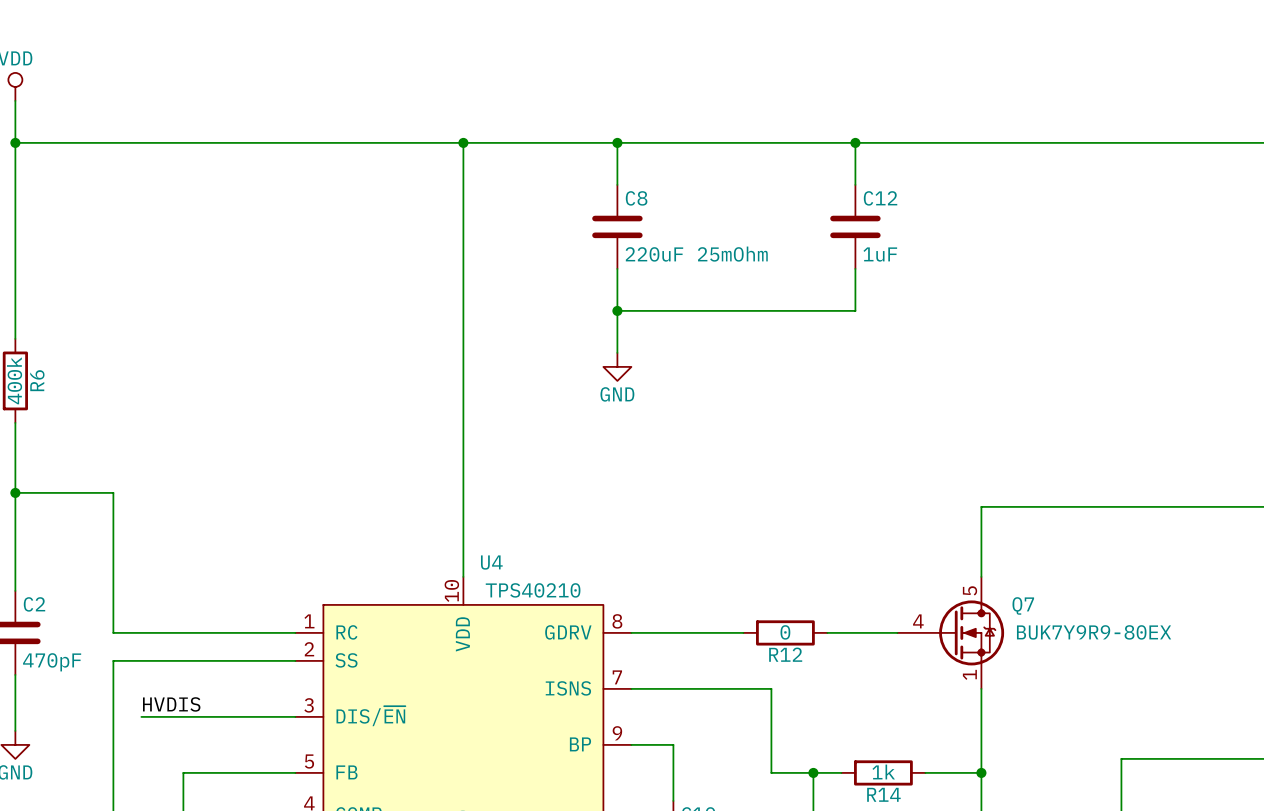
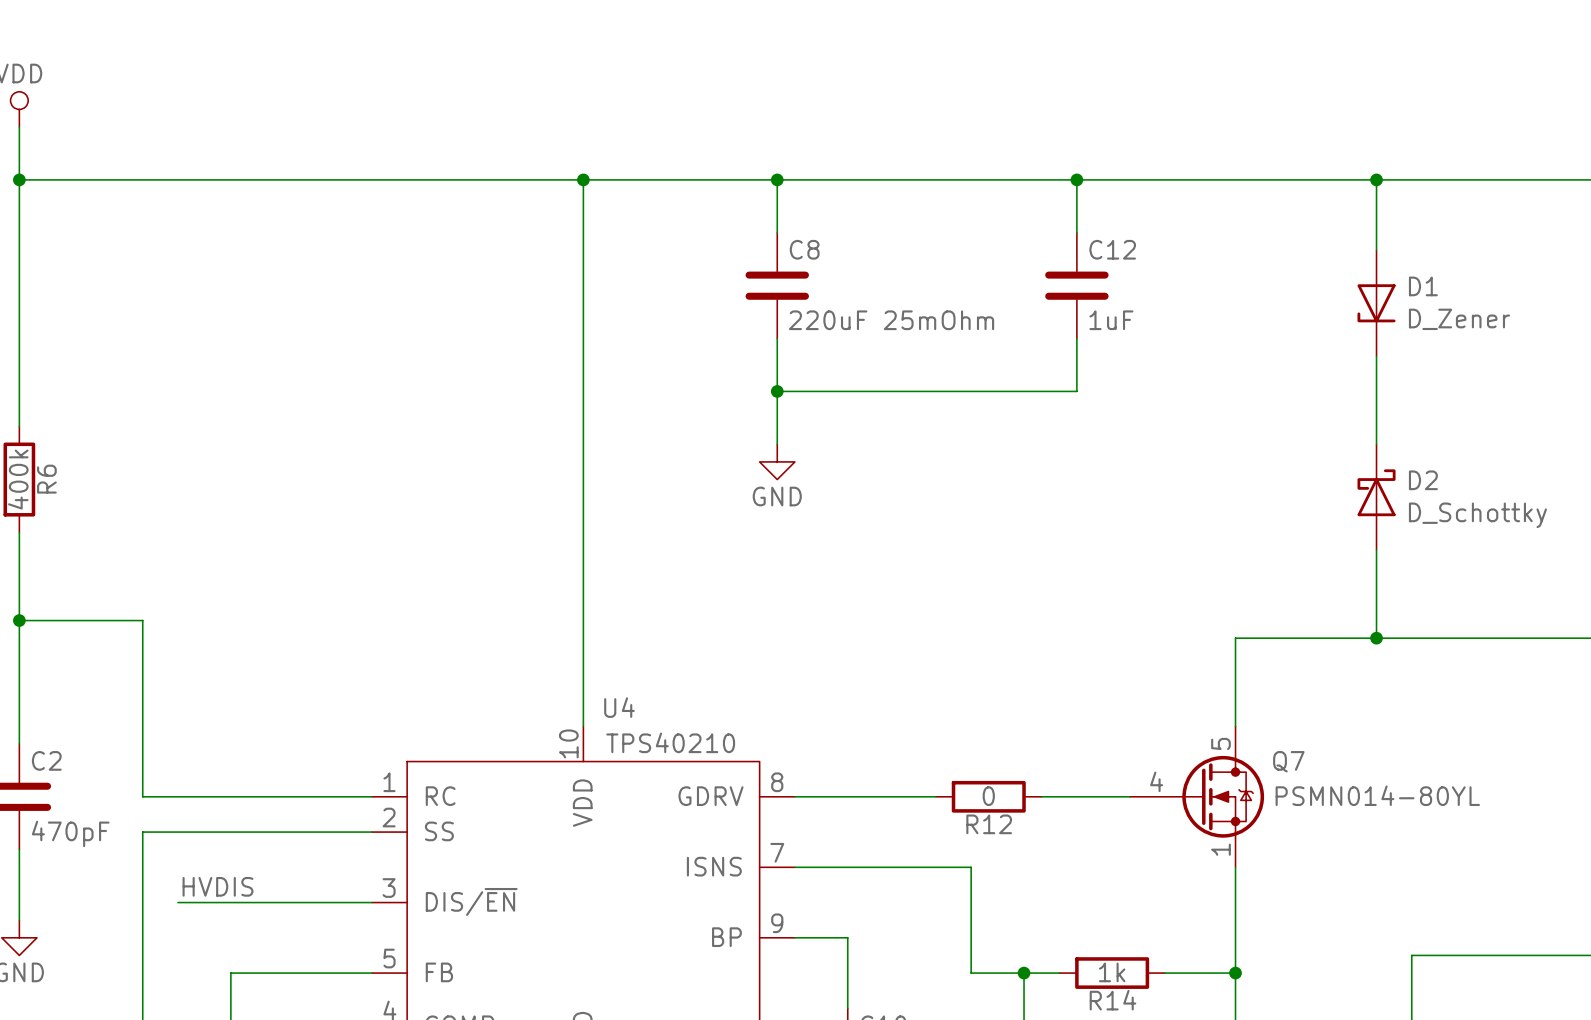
wire: none -> (1376, 179) (1376, 250)
junction: none -> (1376, 179)
D1: none -> D_Zener (1376, 303)
wire: none -> (1376, 356) (1376, 444)
D2: none -> D_Schottky (1376, 497)
wire: none -> (1376, 550) (1376, 638)
junction: none -> (1376, 638)
Q7 value: BUK7Y9R9-80EX (1094, 632) -> PSMN014-80YL (1377, 795)

